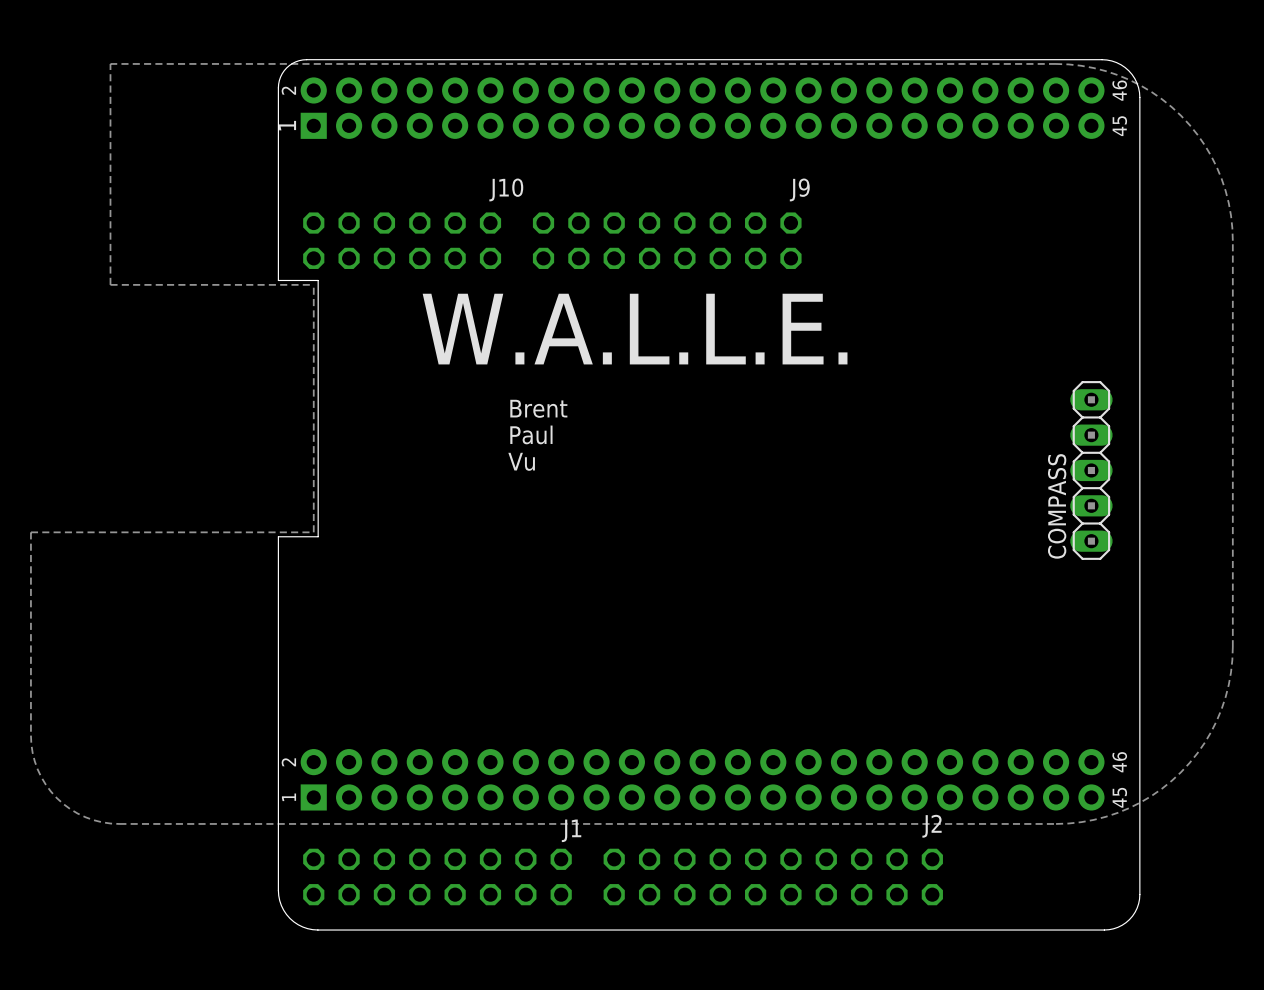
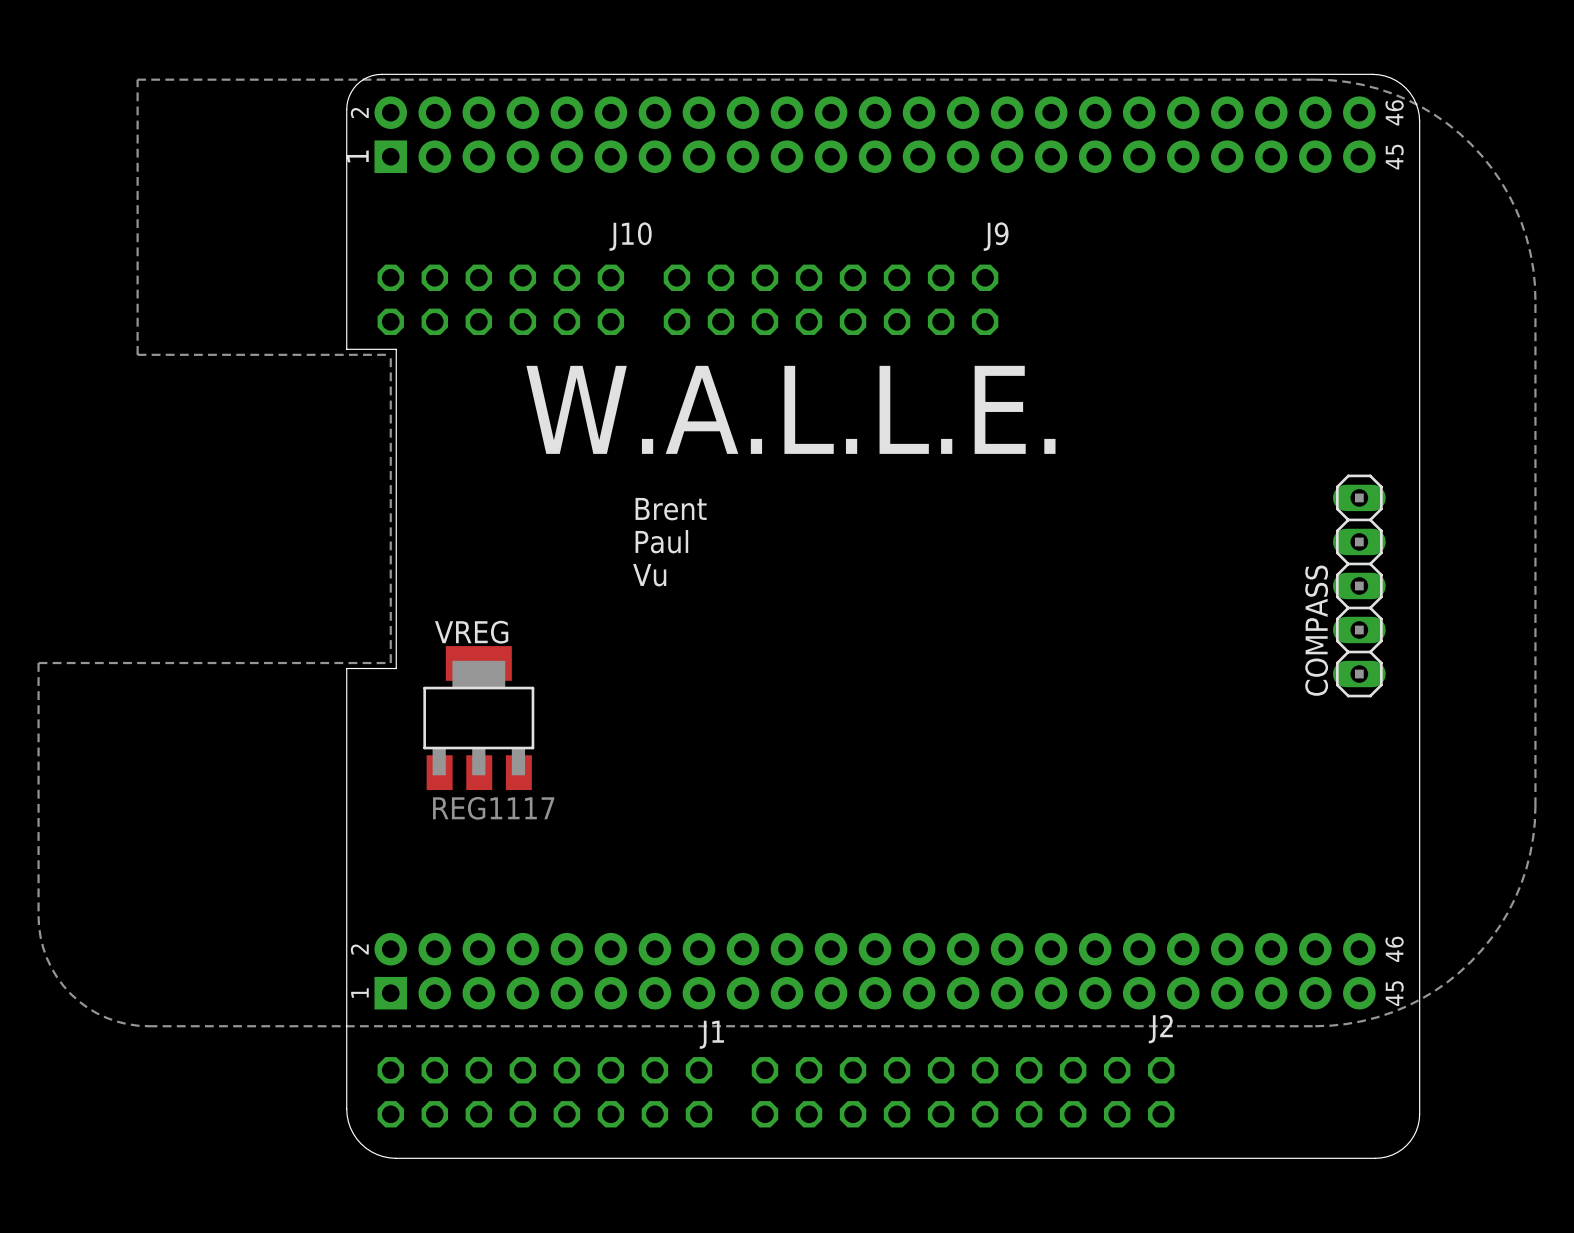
VREG: none -> REG1117 (478, 718)

